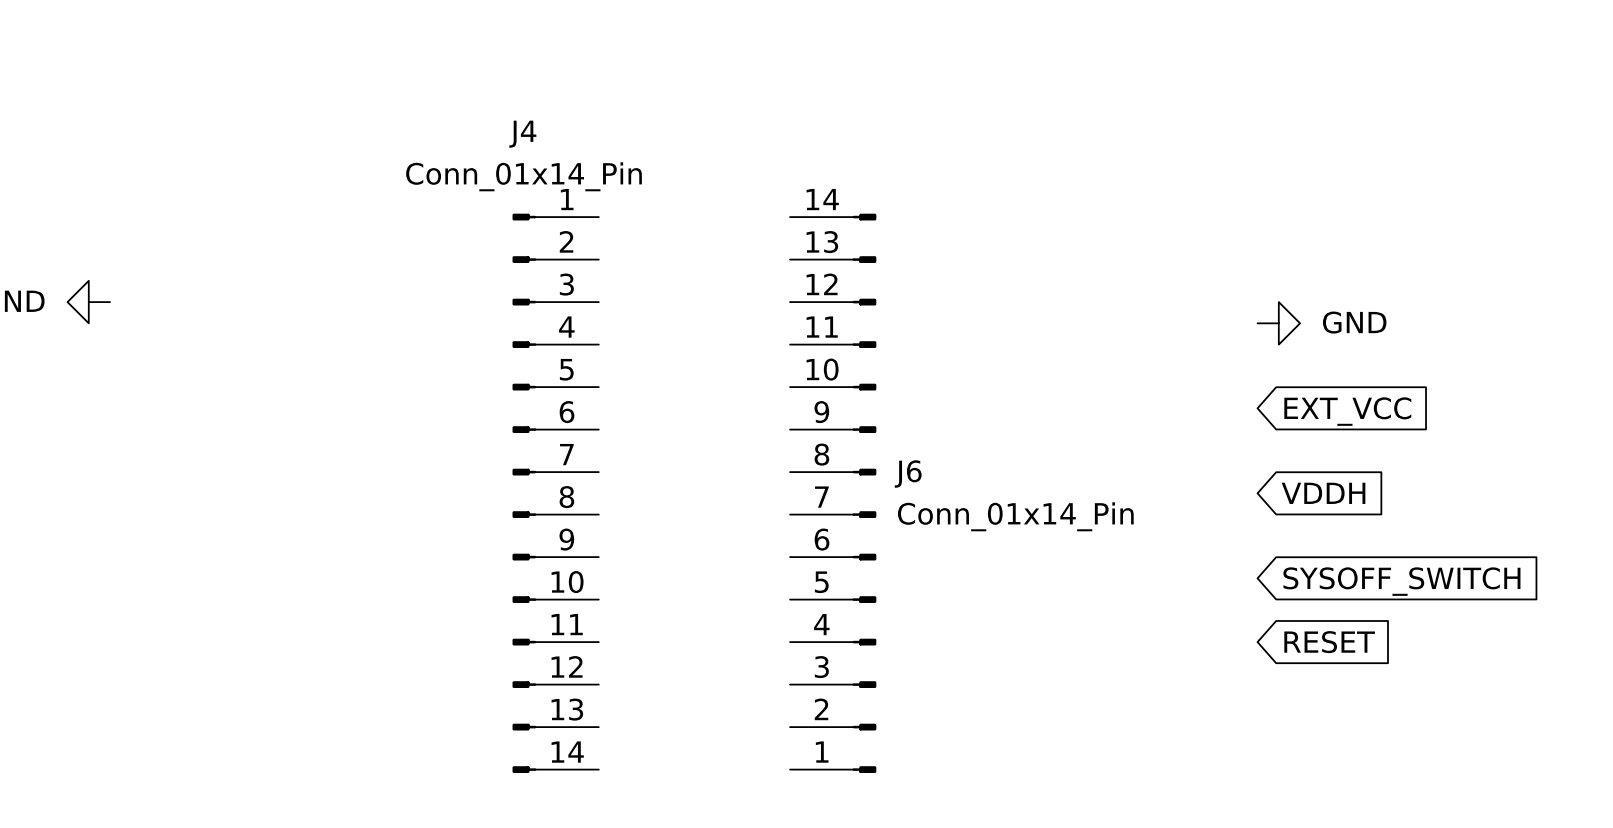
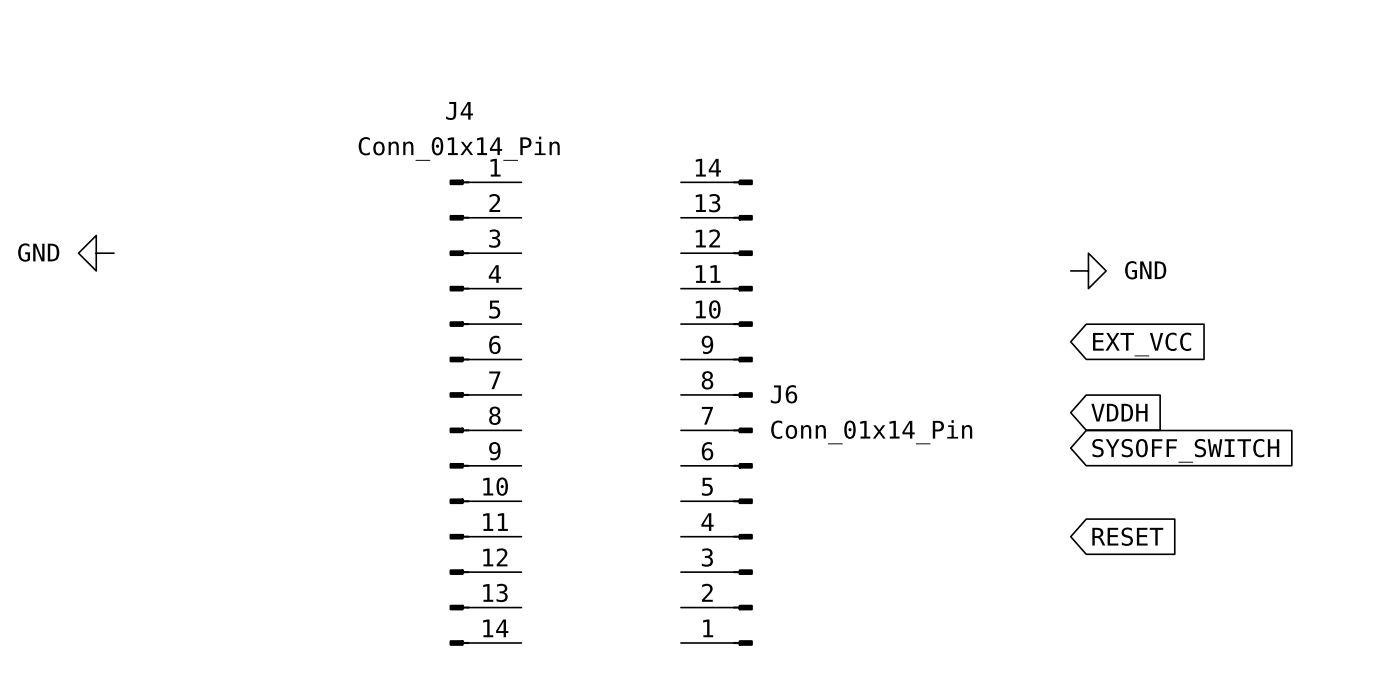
global label position: SYSOFF_SWITCH (1401, 581) -> SYSOFF_SWITCH (1185, 450)

